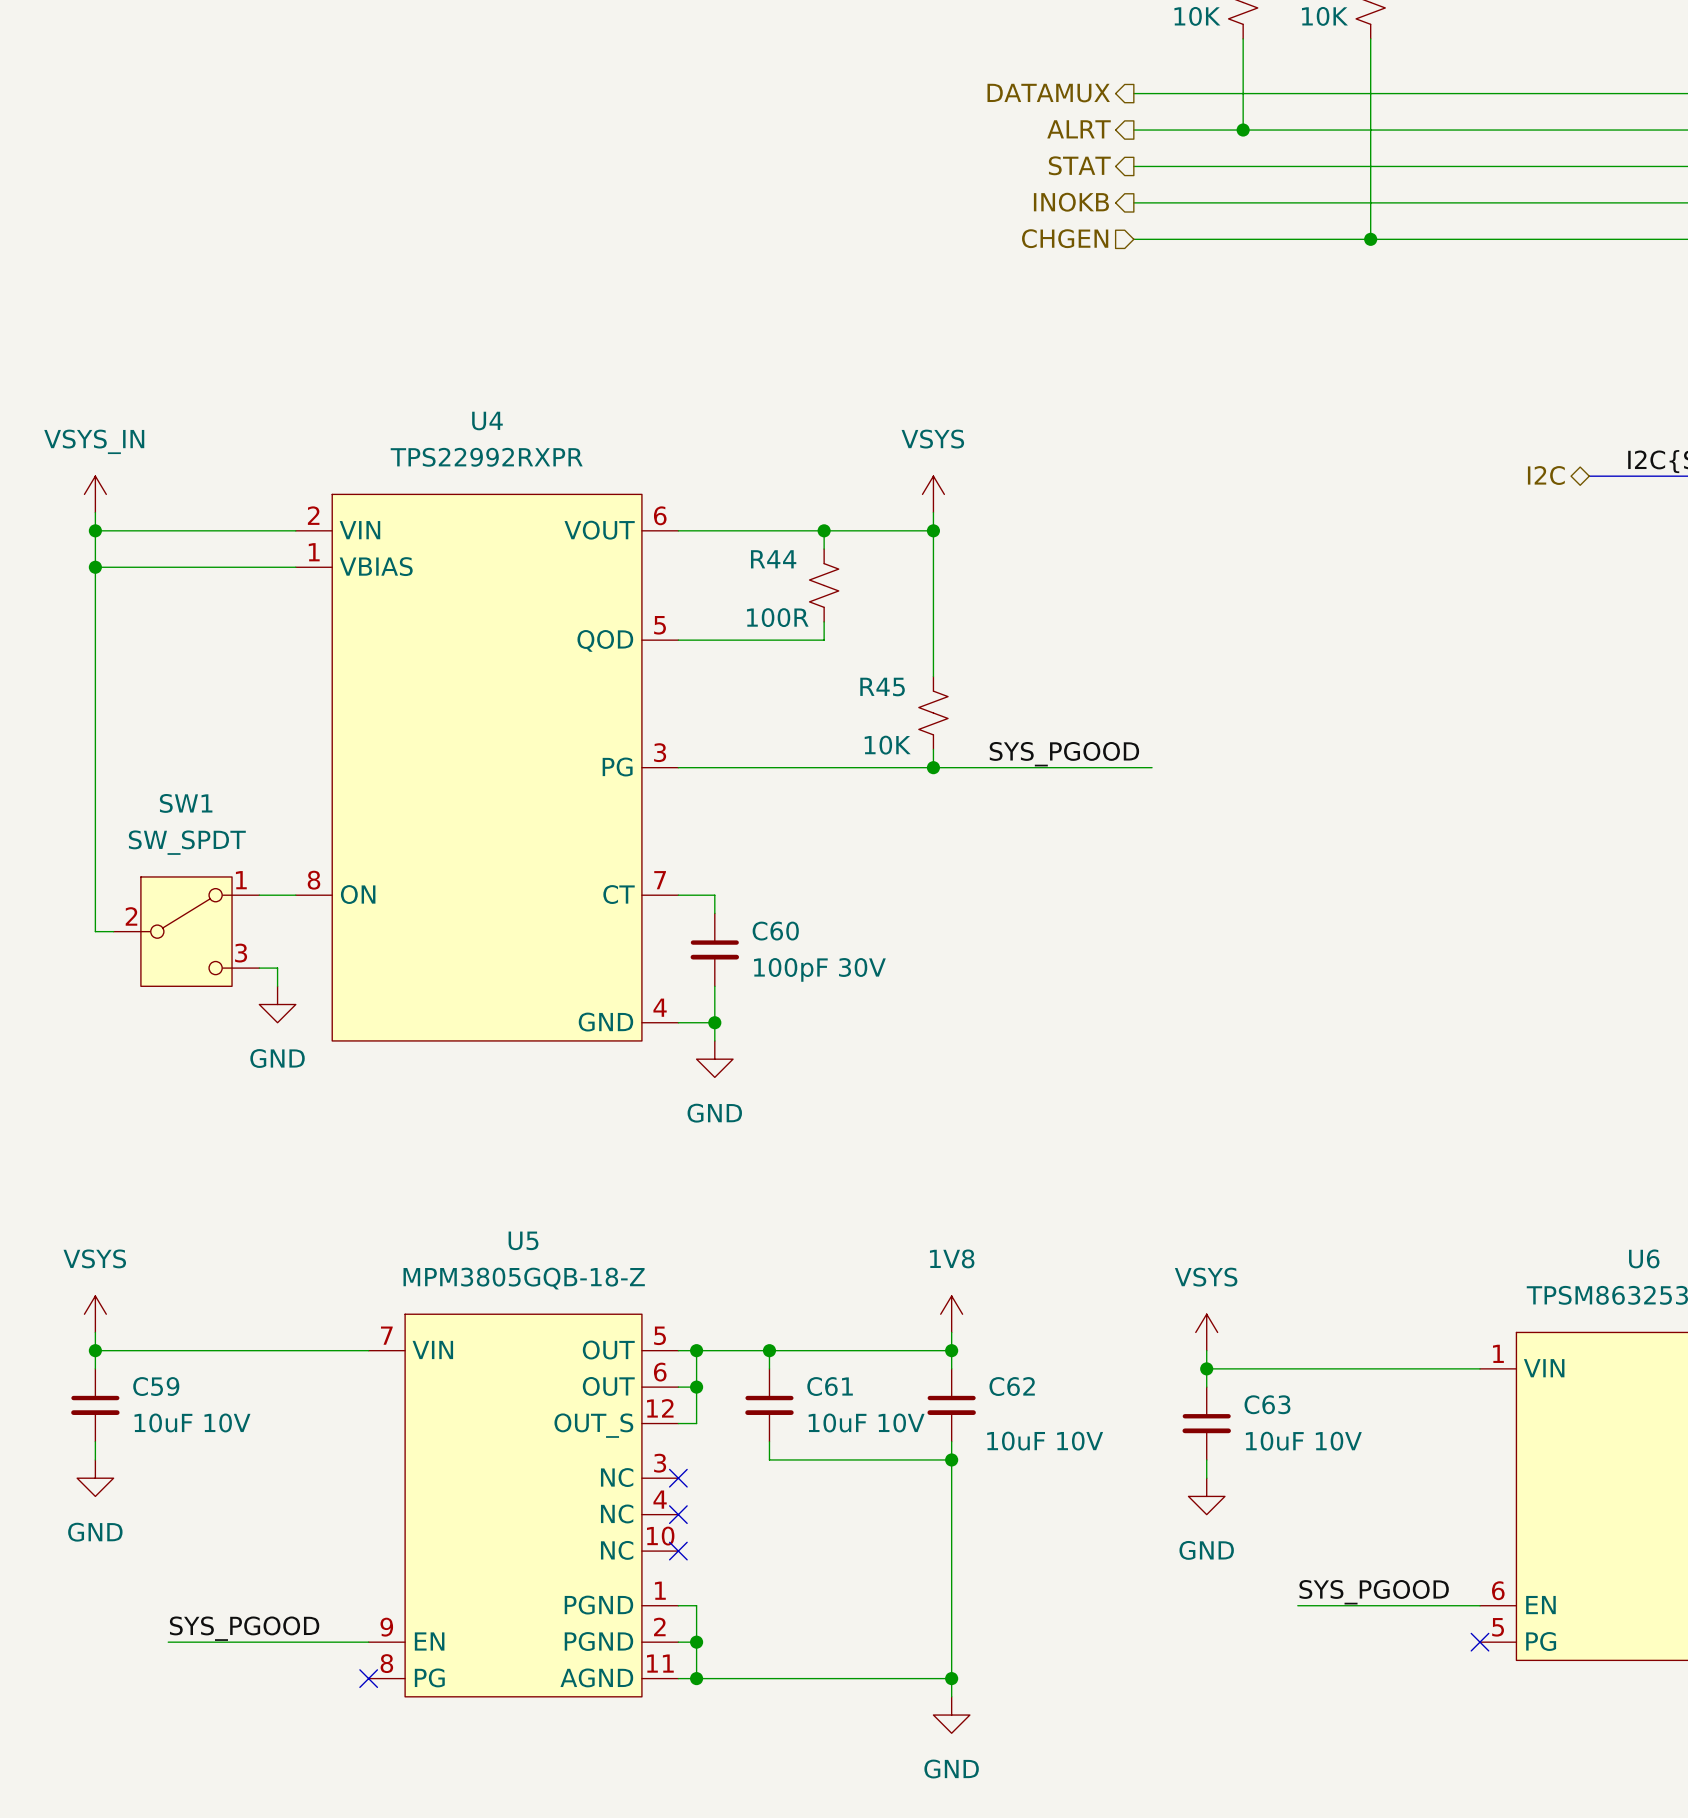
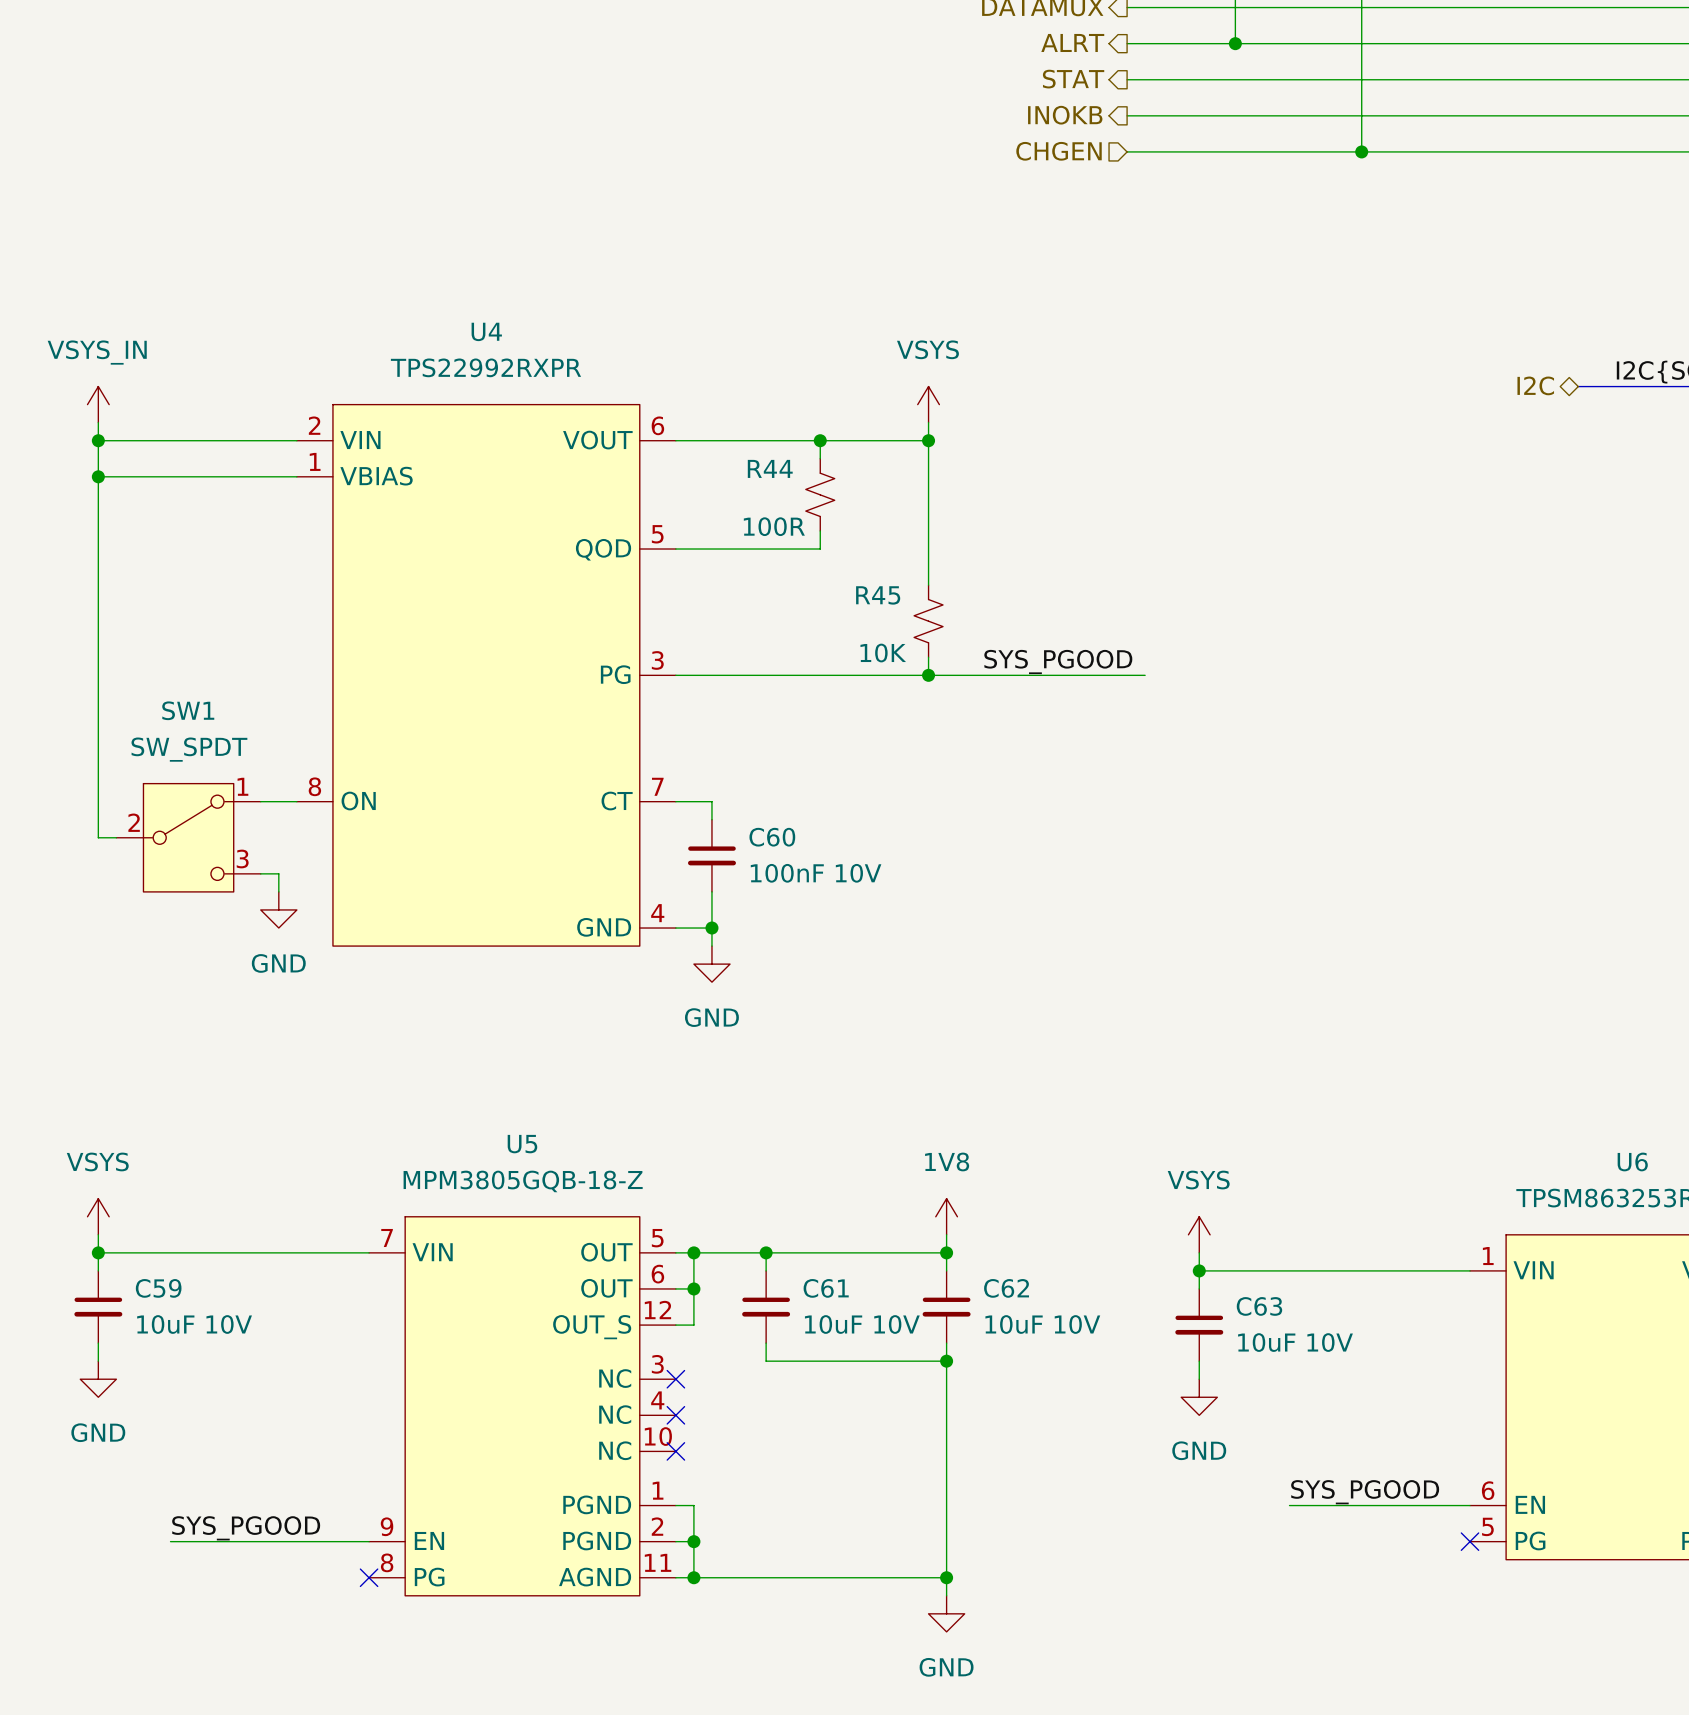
C60 value: 100pF 30V (819, 969) -> 100nF 10V (816, 873)
C62 value position: 10uF 10V (1045, 1441) -> 10uF 10V (1042, 1324)

